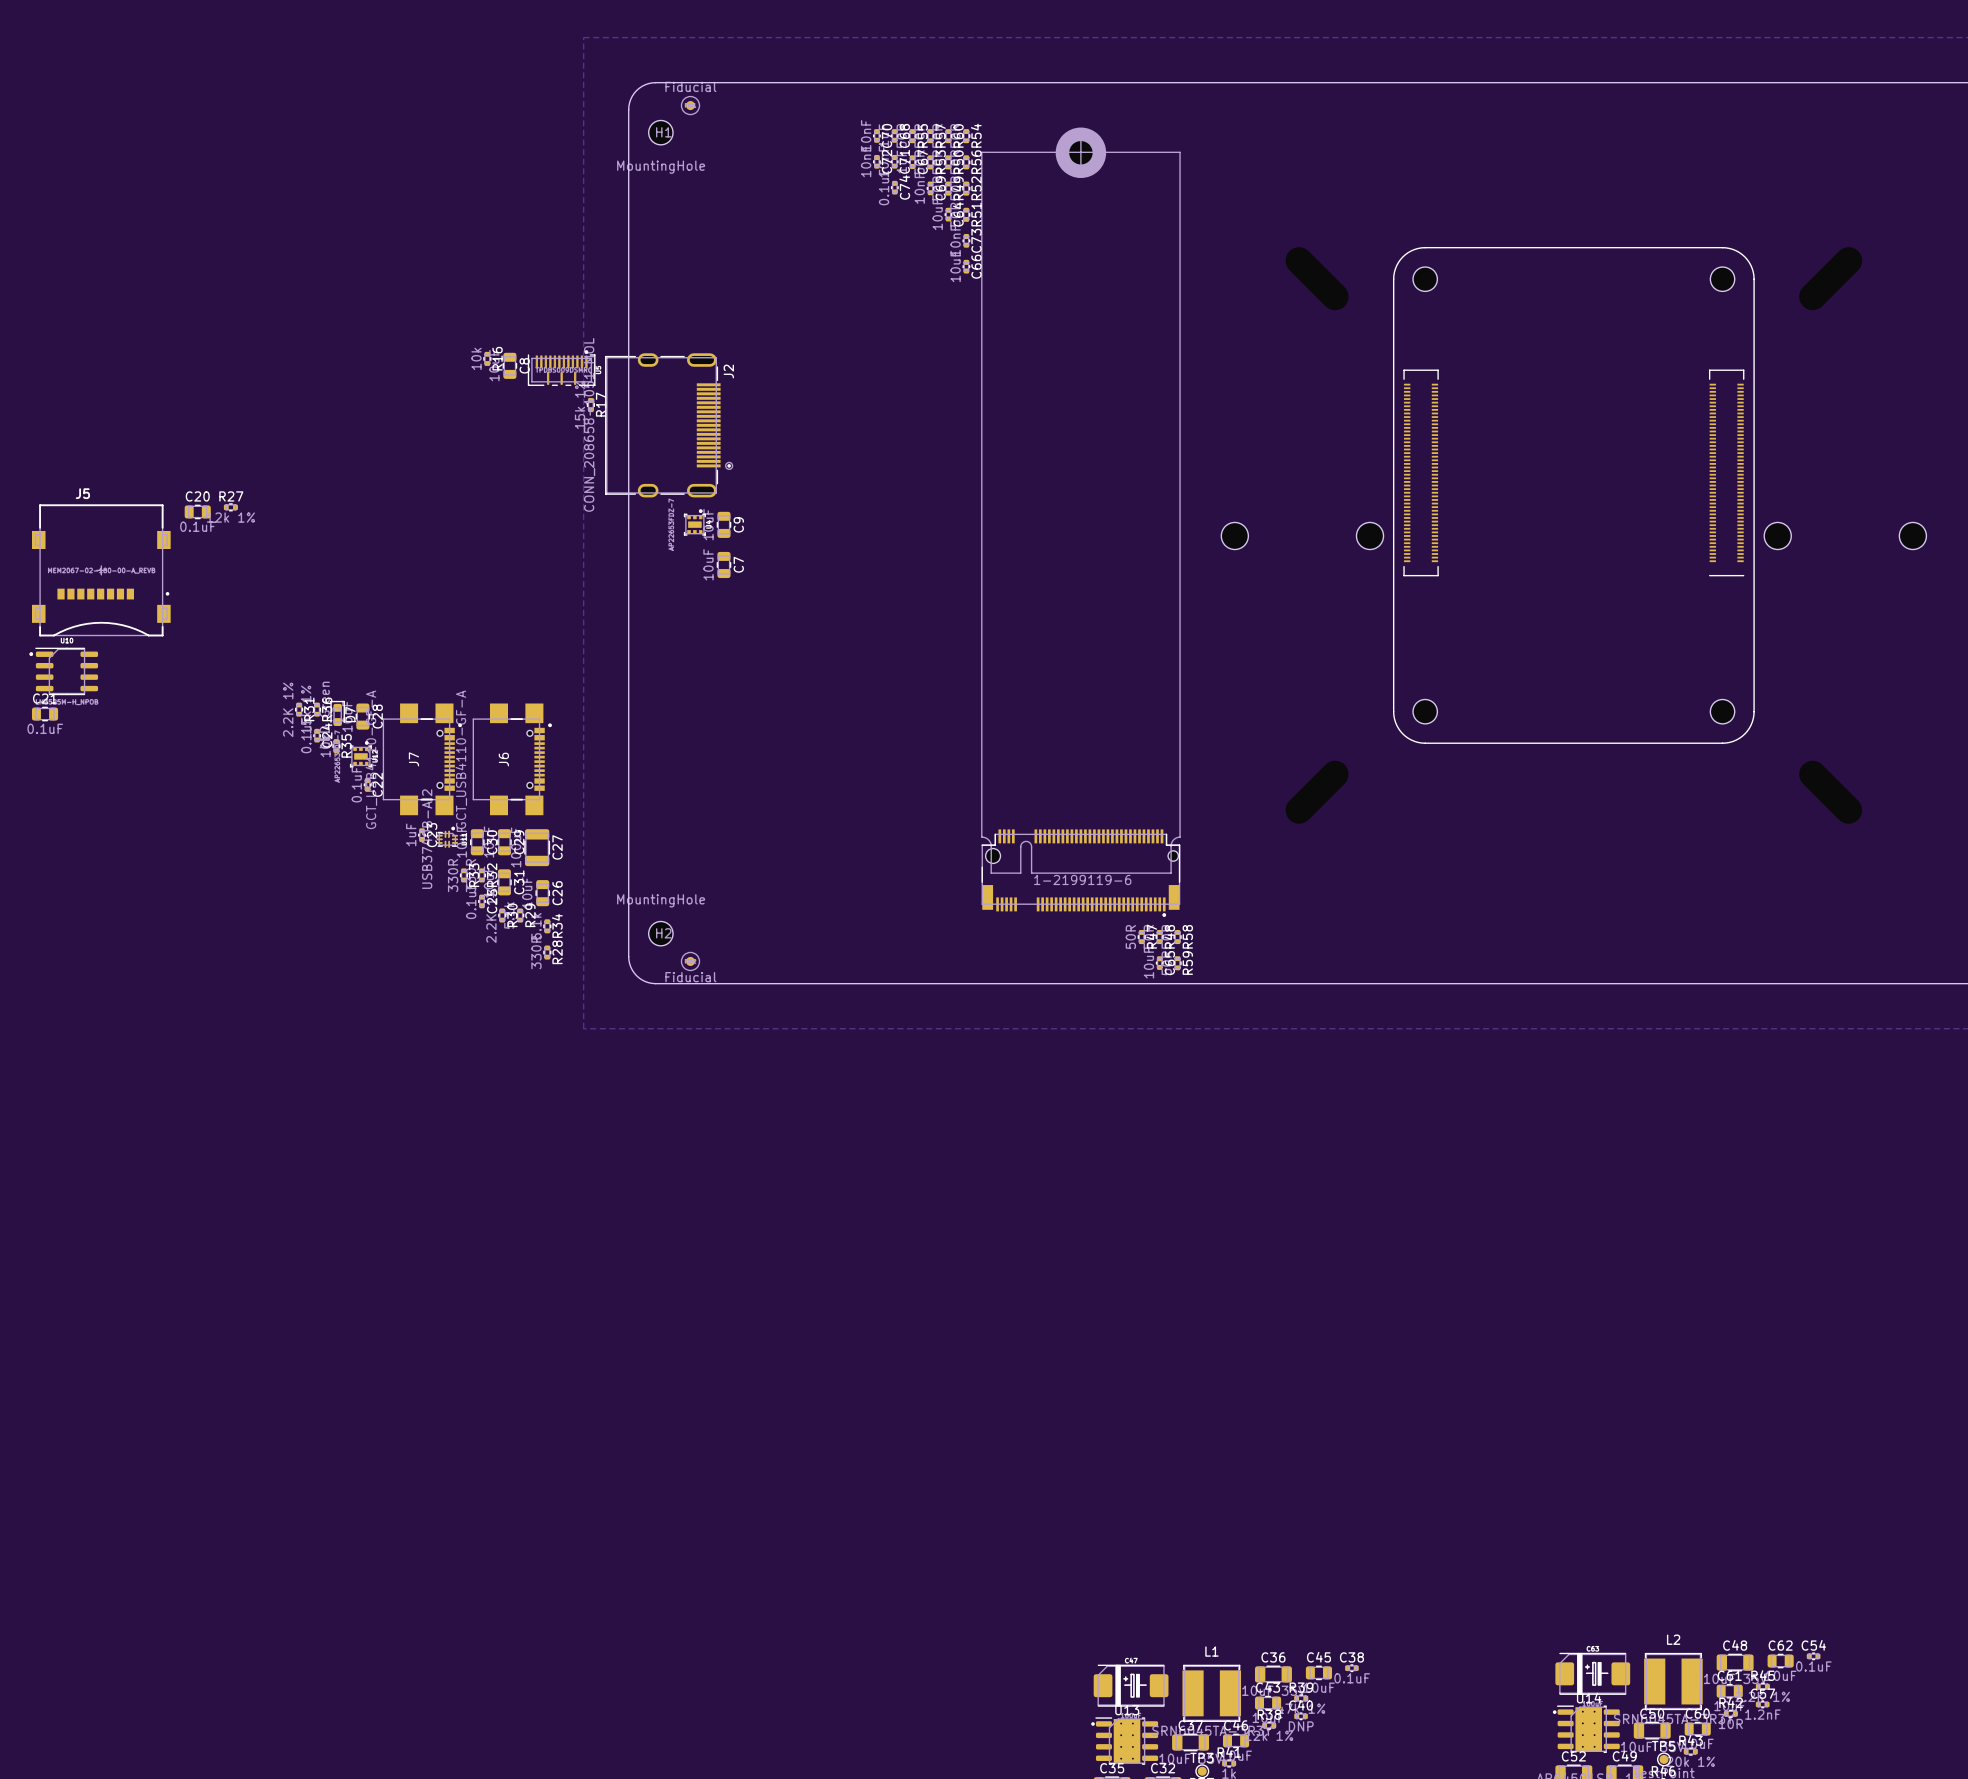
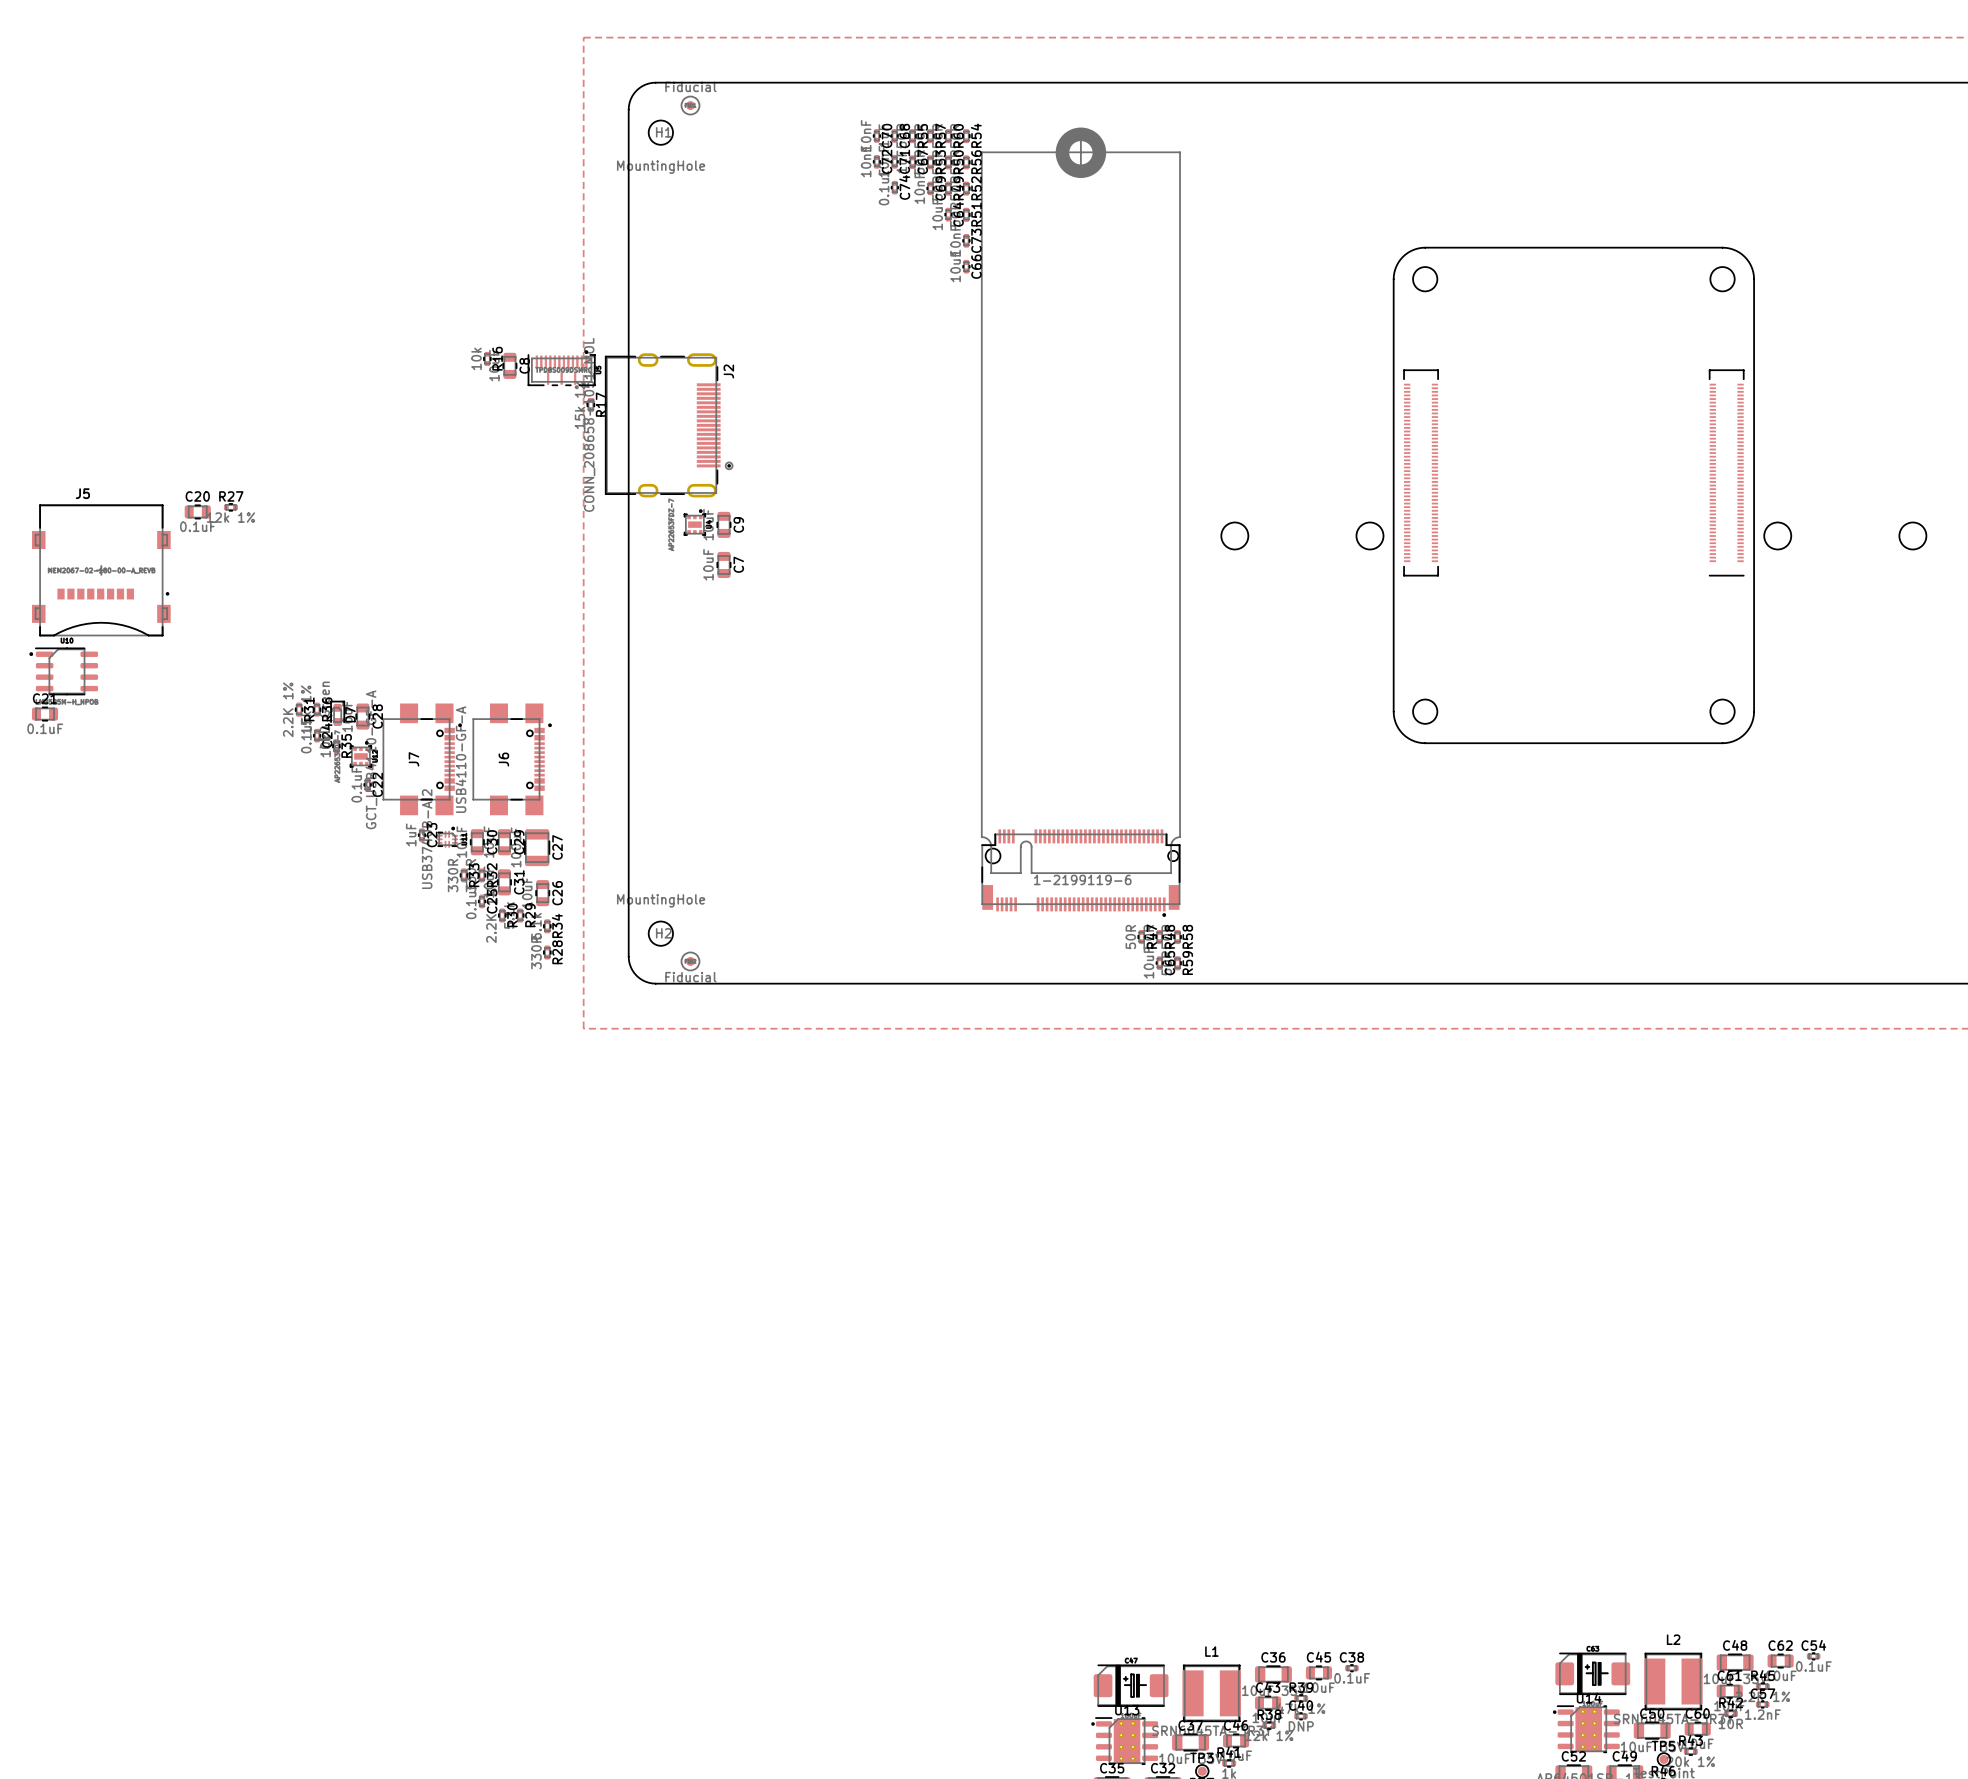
J6 value: GCT_USB4110-GF-A (461, 759) -> USB4110-GF-A (460, 759)

